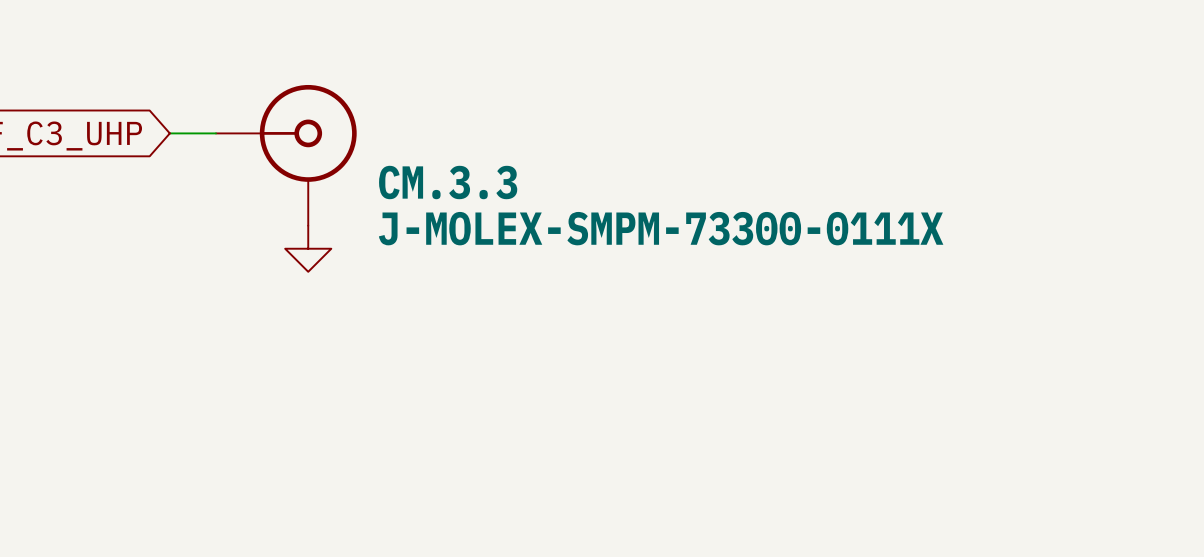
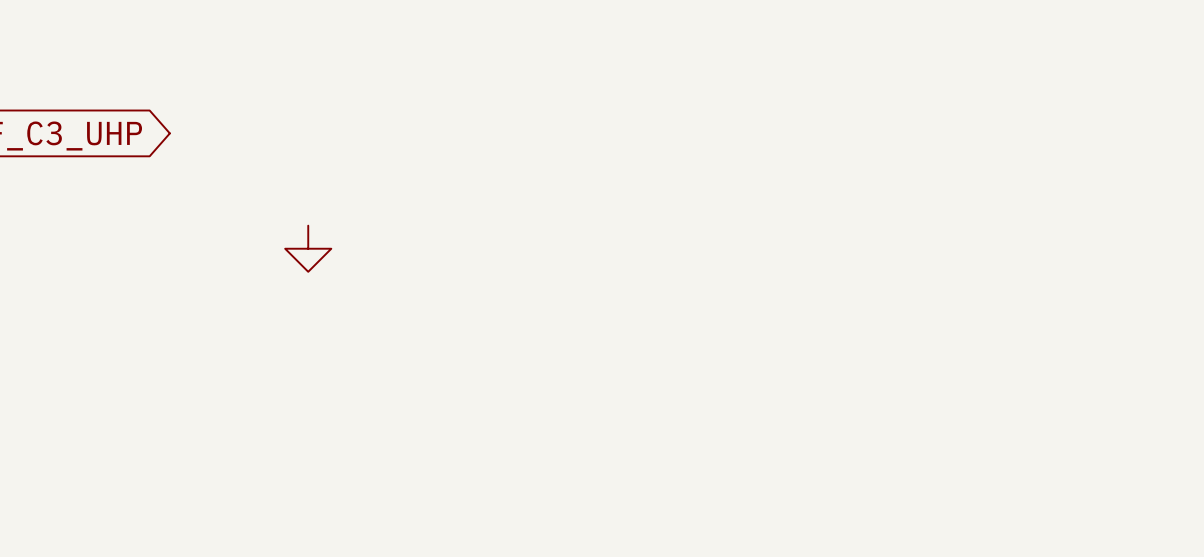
wire: (169, 133) (215, 133) -> none
CM.3.3: J-MOLEX-SMPM-73300-0111X (286, 155) -> none

